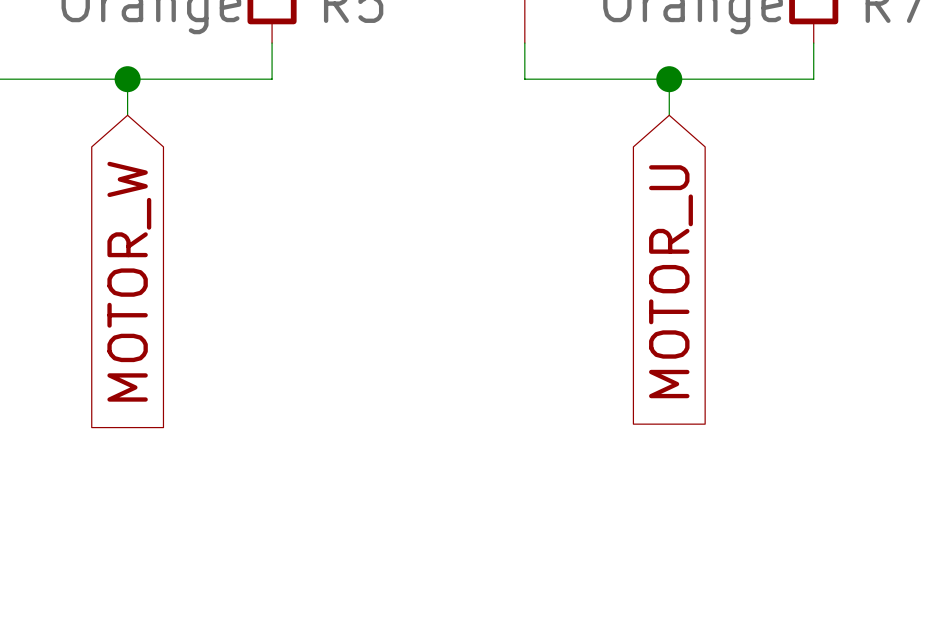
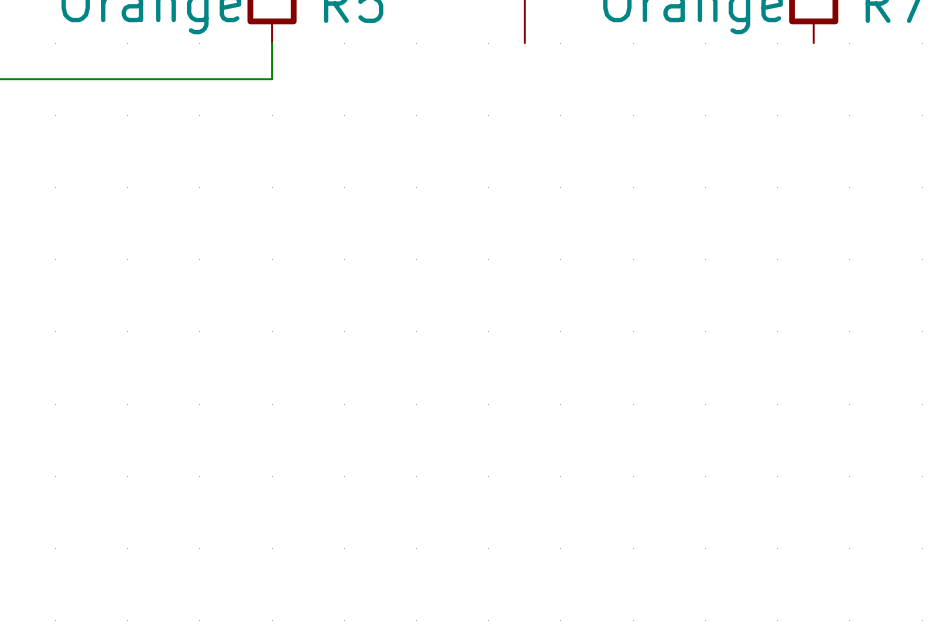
wire: (524, 43) (524, 79) (813, 79) (813, 43) -> none
wire: (127, 79) (127, 115) -> none
junction: (127, 79) -> none
wire: (669, 79) (669, 115) -> none
junction: (669, 79) -> none
global label: MOTOR_W (129, 281) -> none
global label: MOTOR_U (670, 281) -> none

